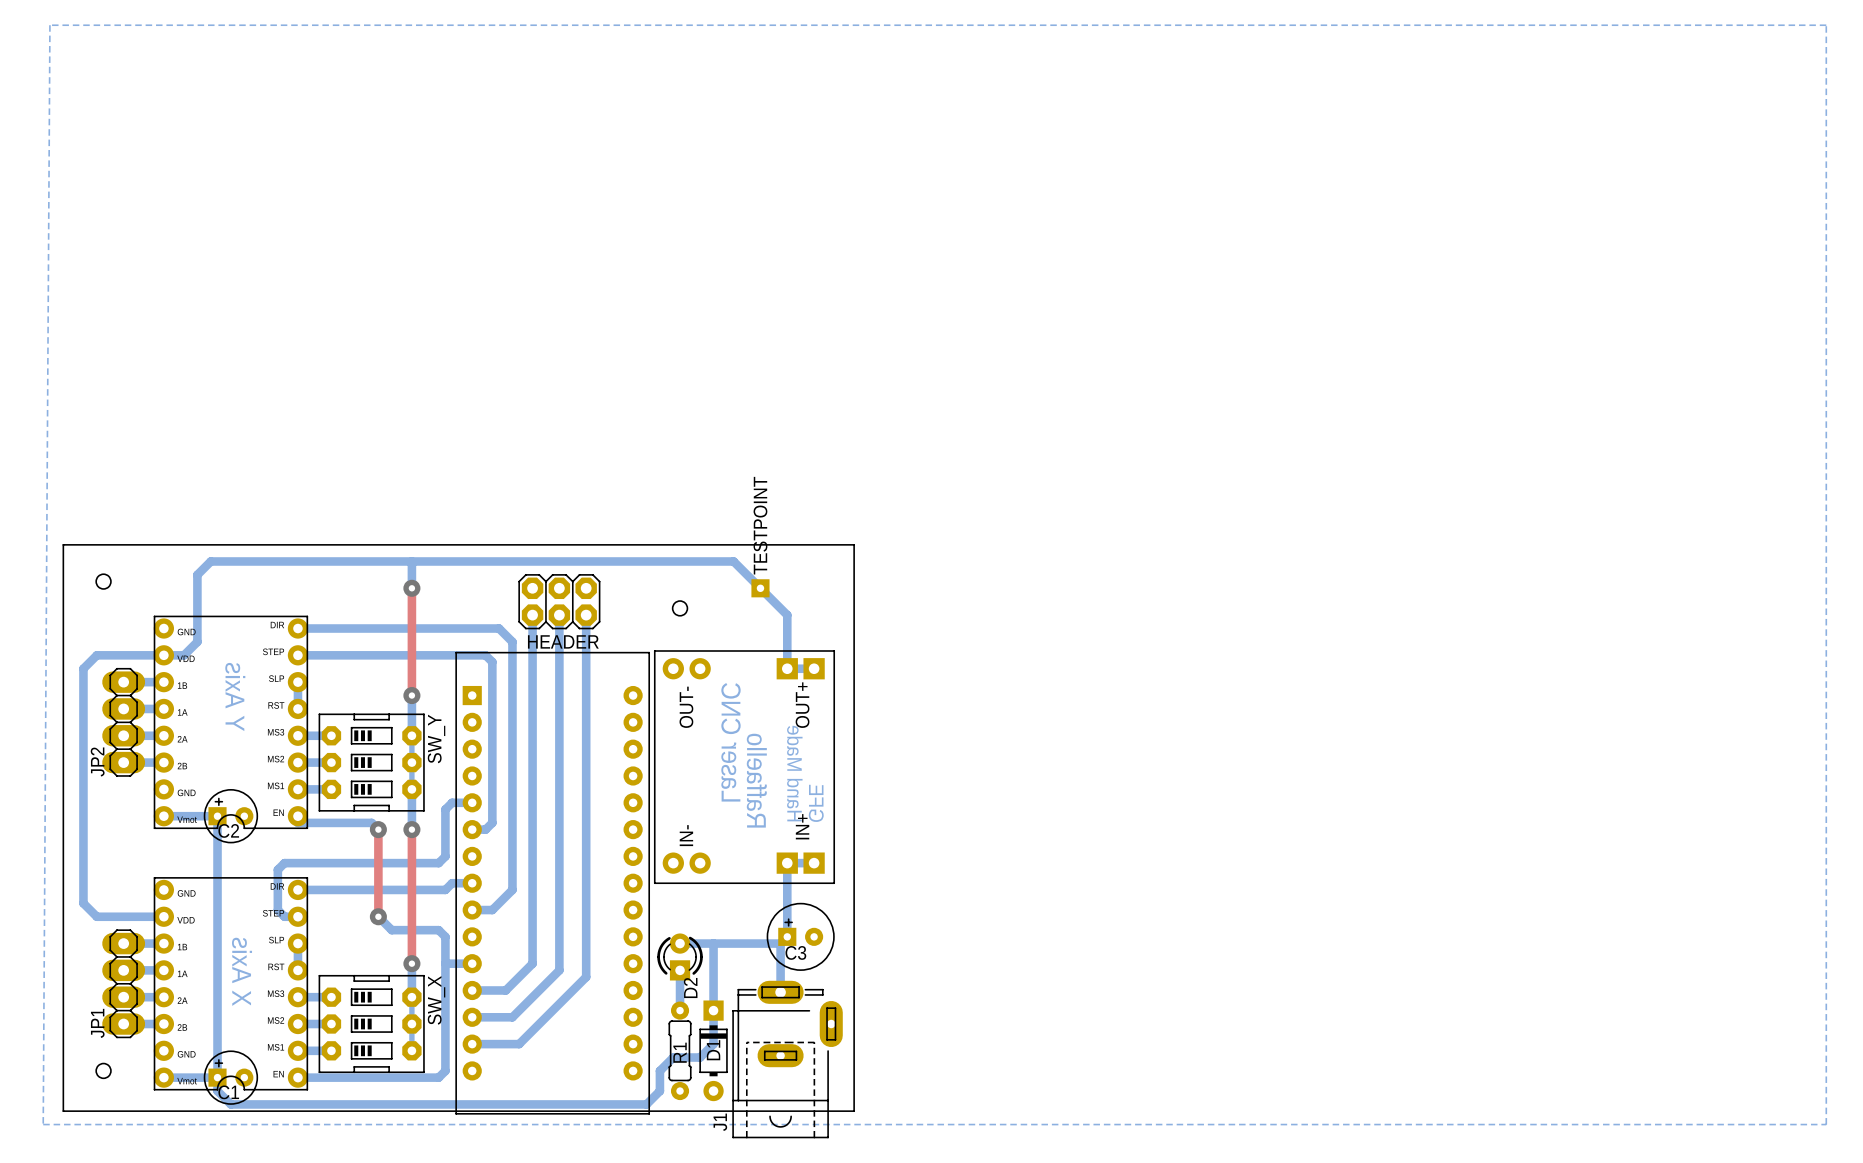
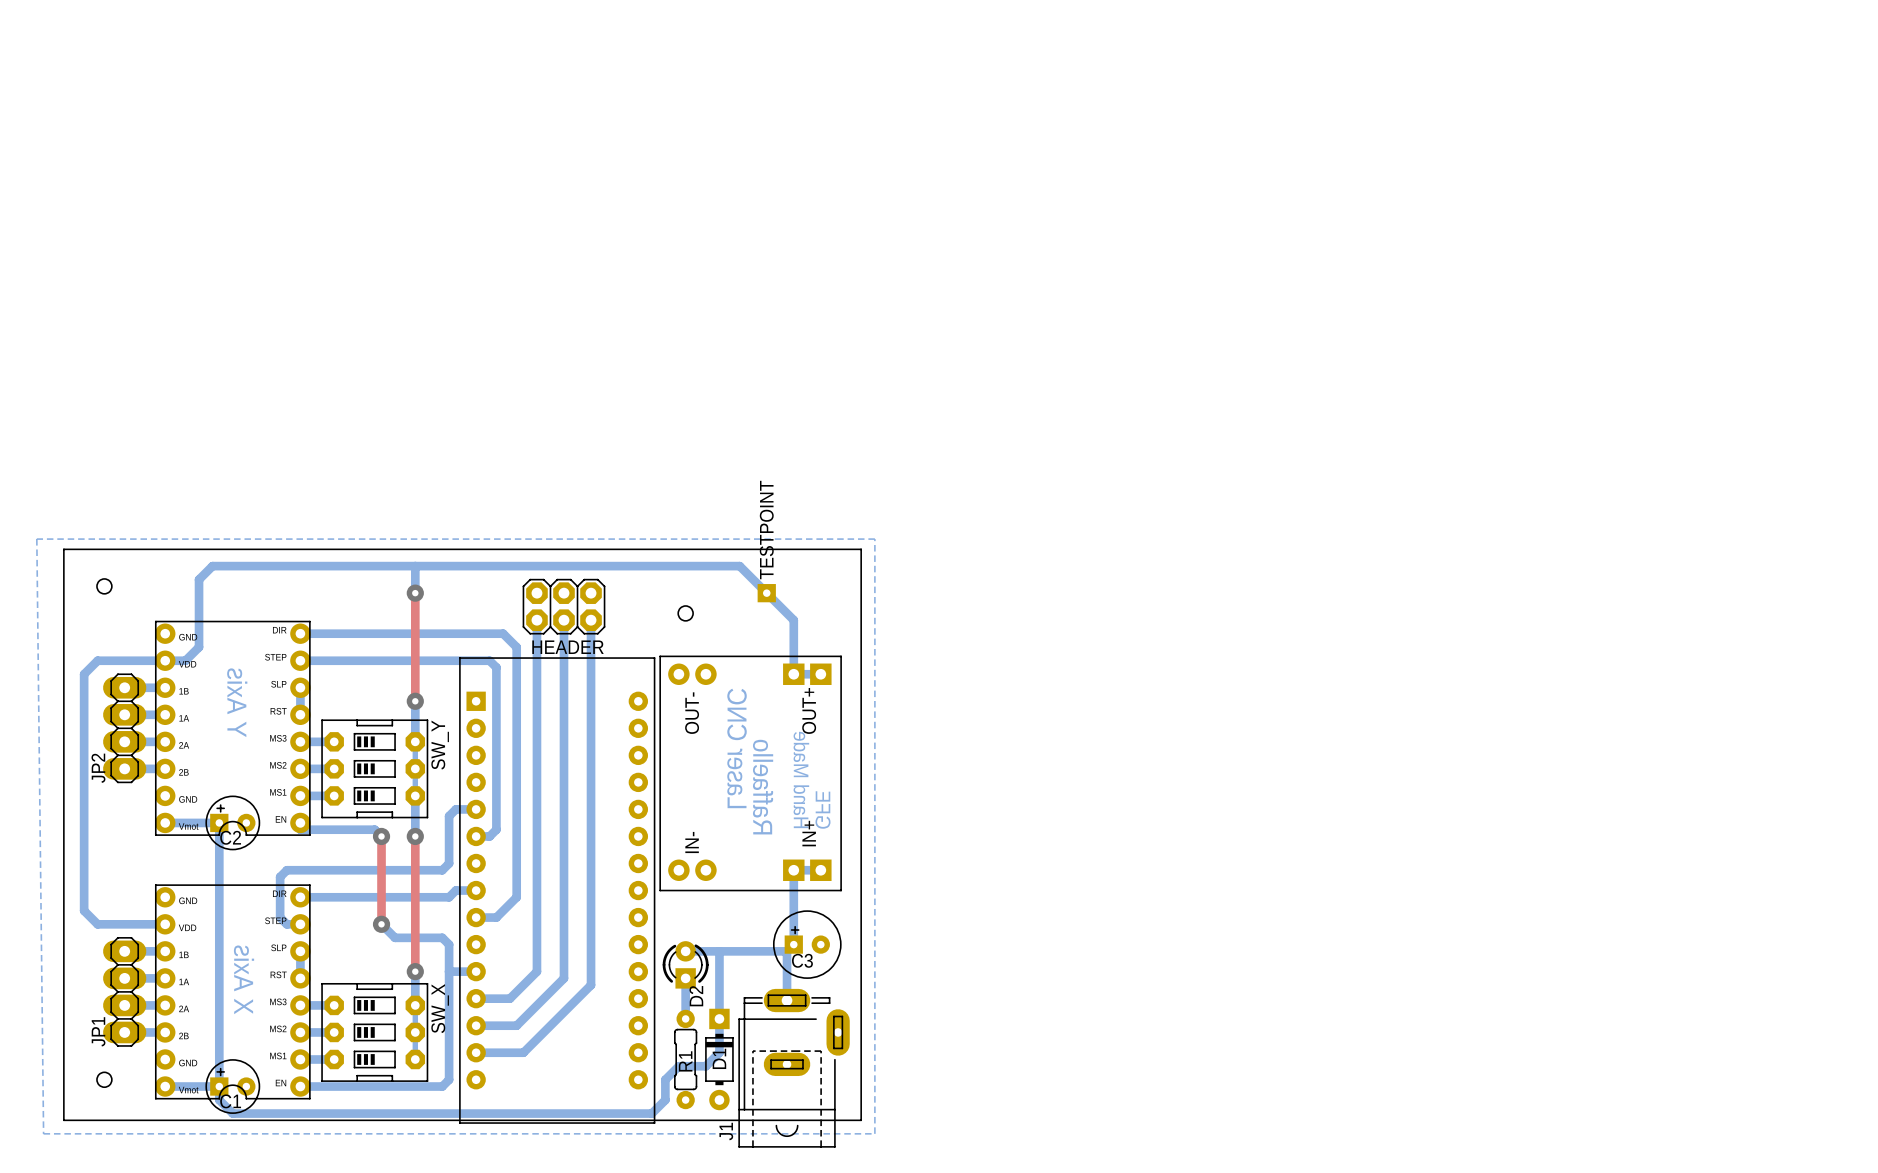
bottom zone outline: (43, 1124) (49, 25) (1826, 25) (1826, 1124) (867, 1124) -> (43, 1133) (36, 539) (874, 539) (874, 1133)

